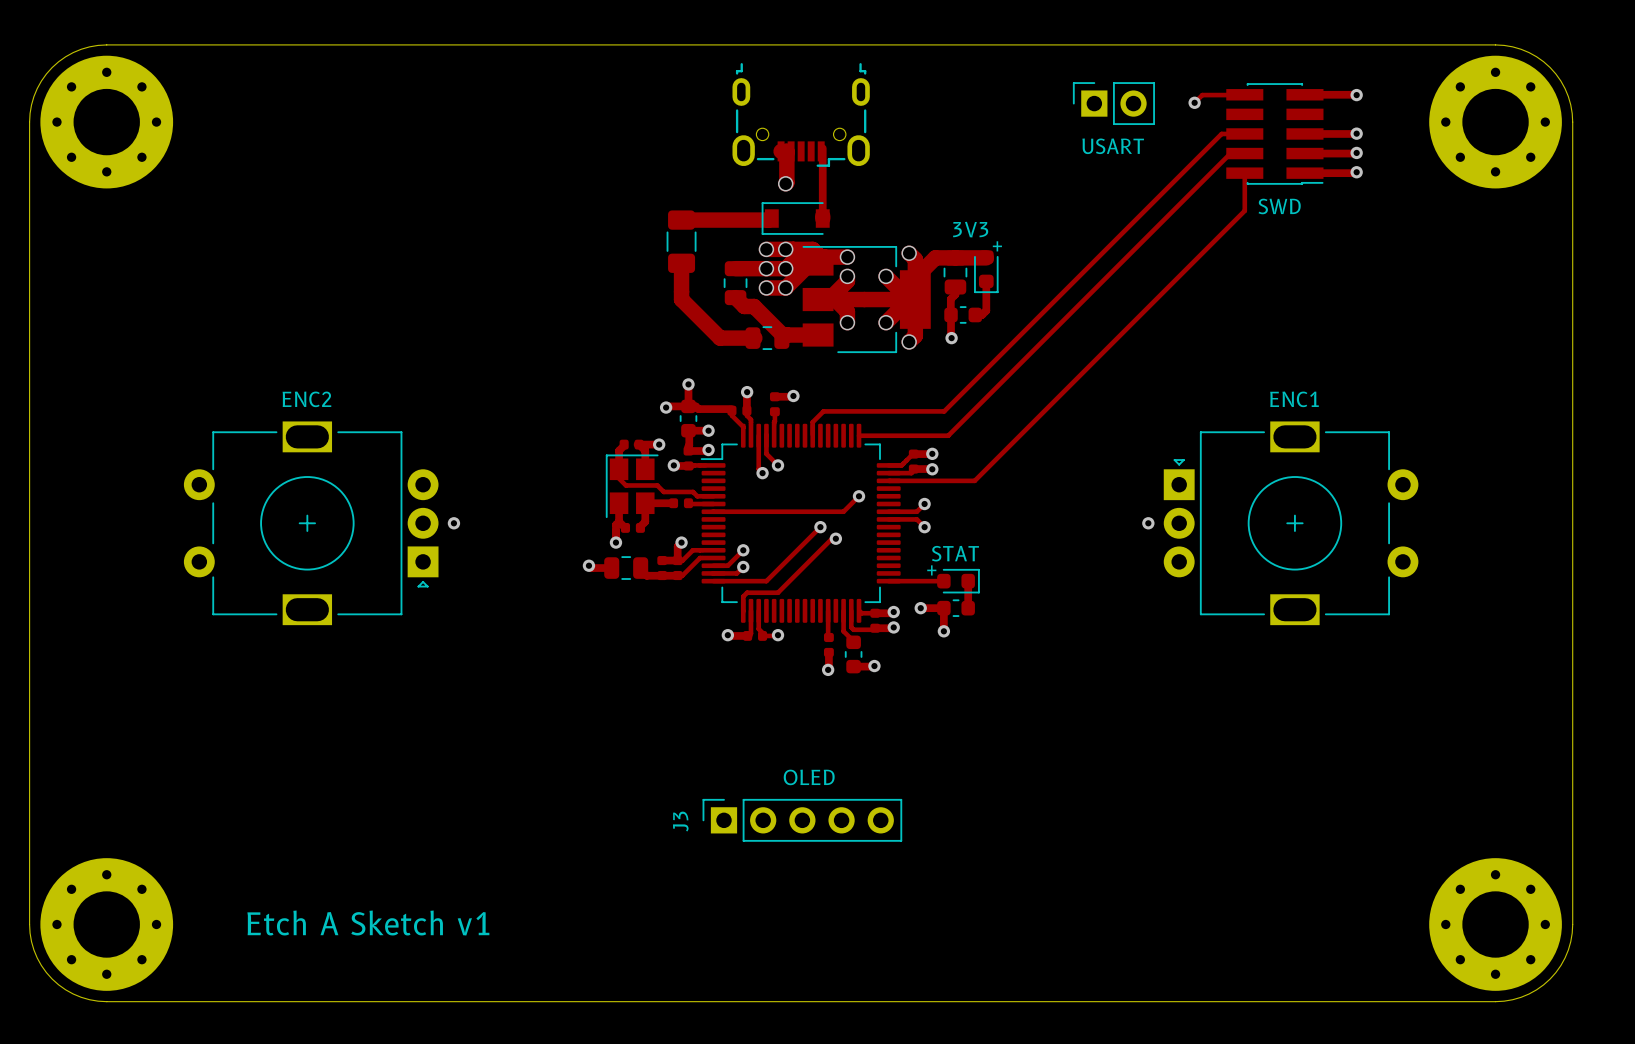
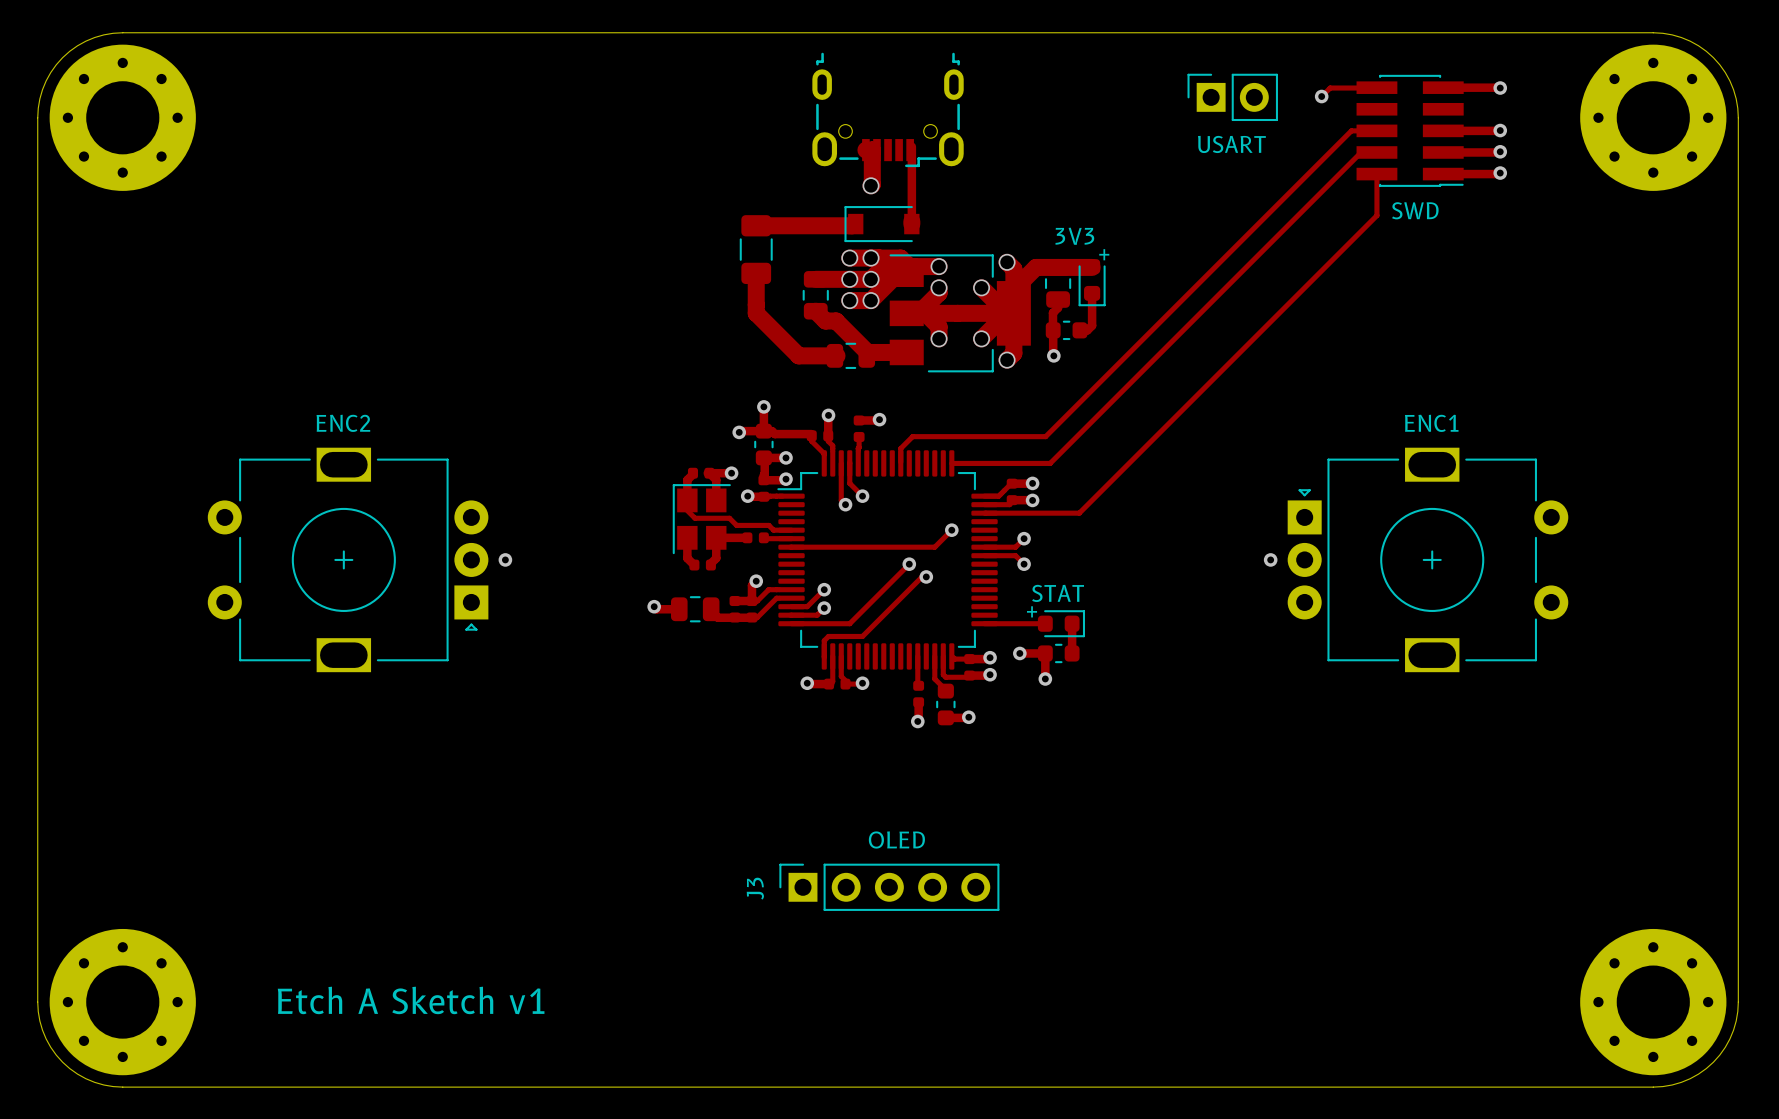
track: (619, 521) (615, 524) (615, 542) -> none
via: (615, 542) -> none

